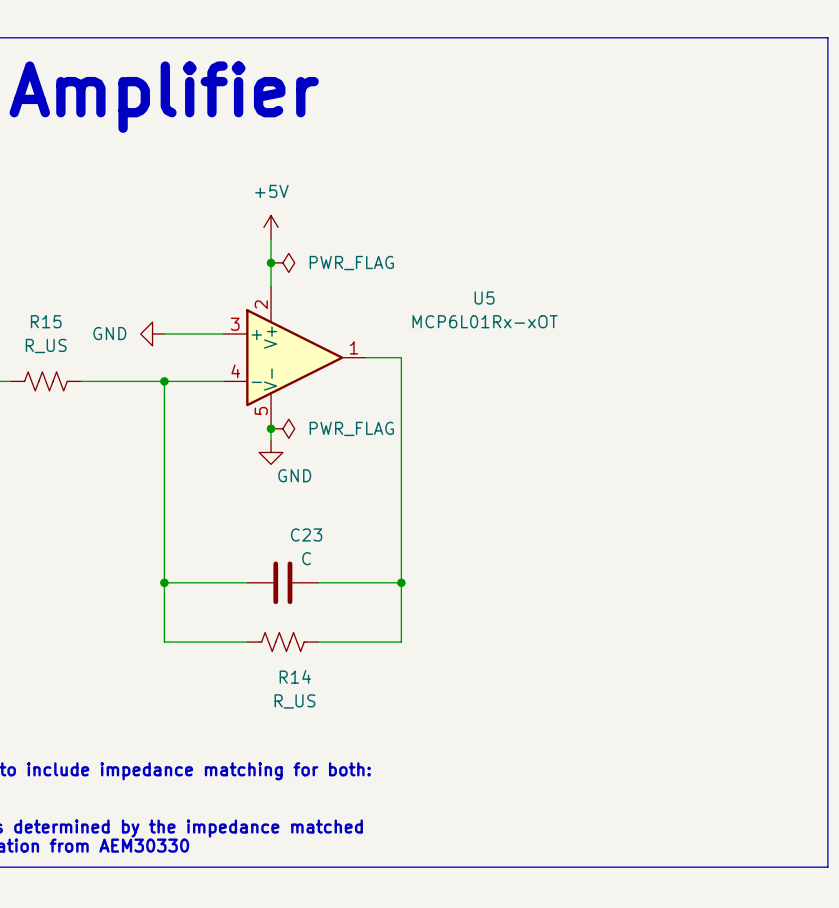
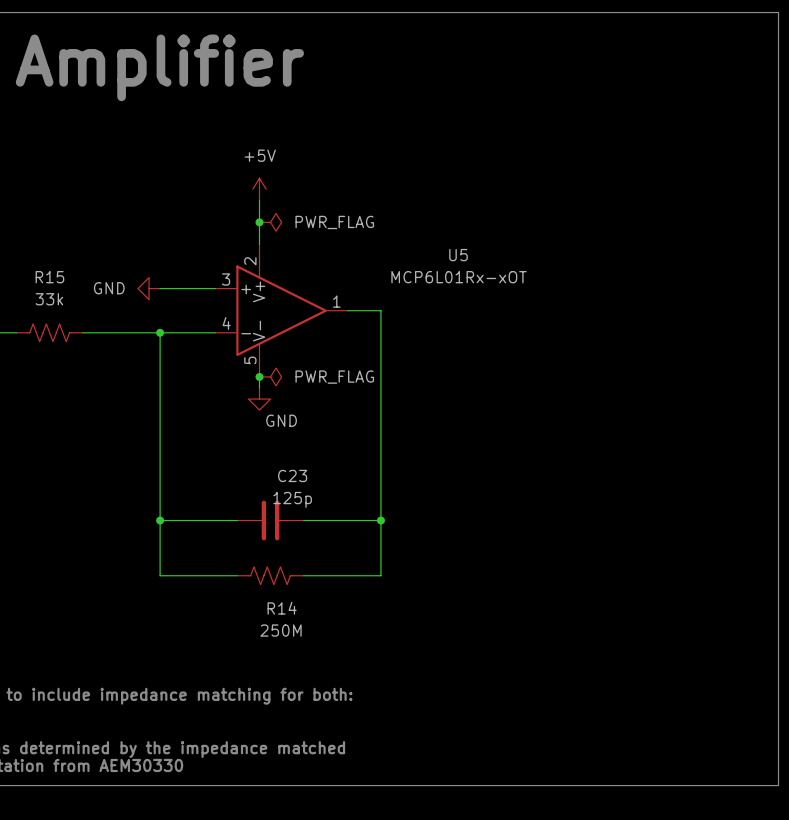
R15 value: R_US (46, 345) -> 33k (49, 299)
C23 value: C (306, 558) -> 125p (292, 499)
R14 value: R_US (295, 701) -> 250M (281, 630)

